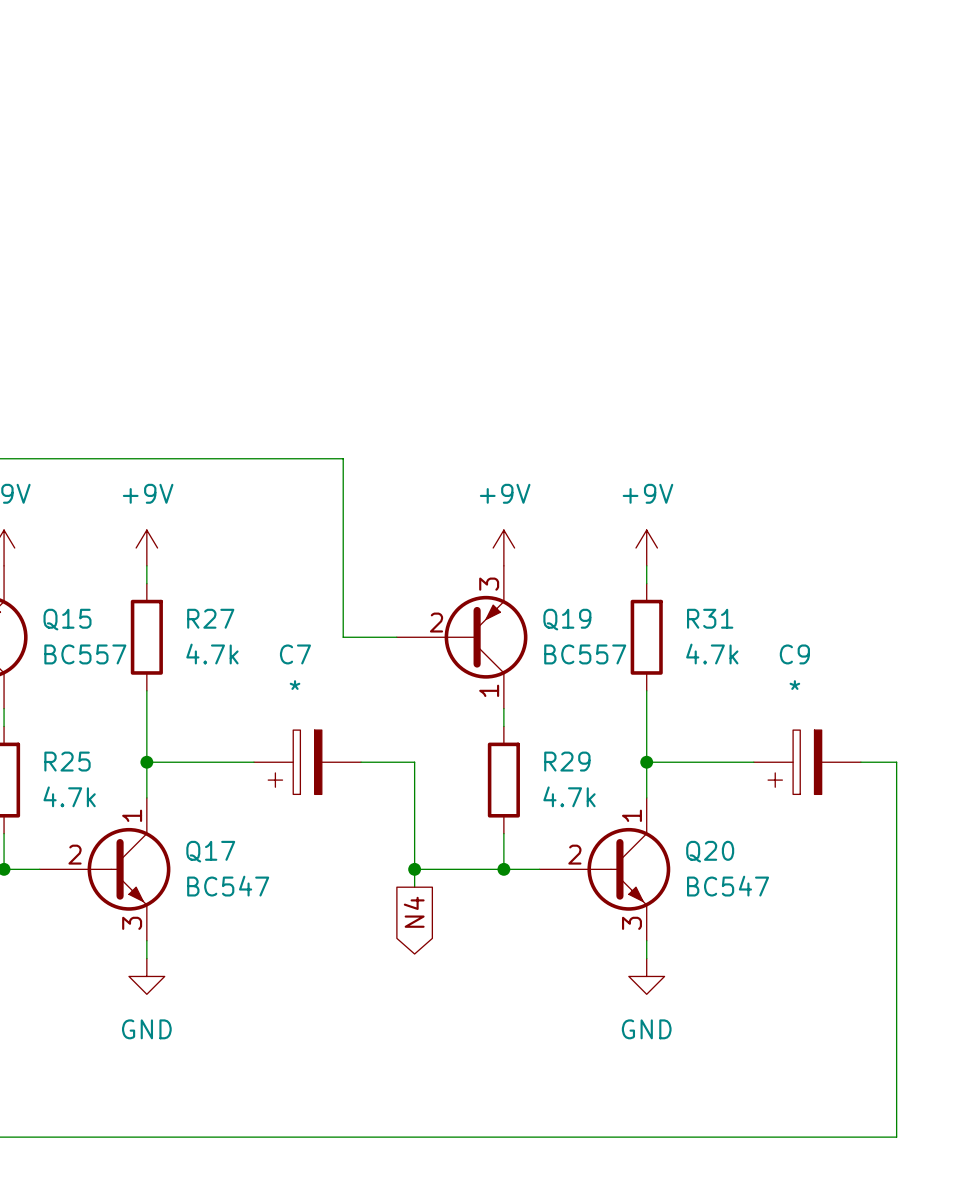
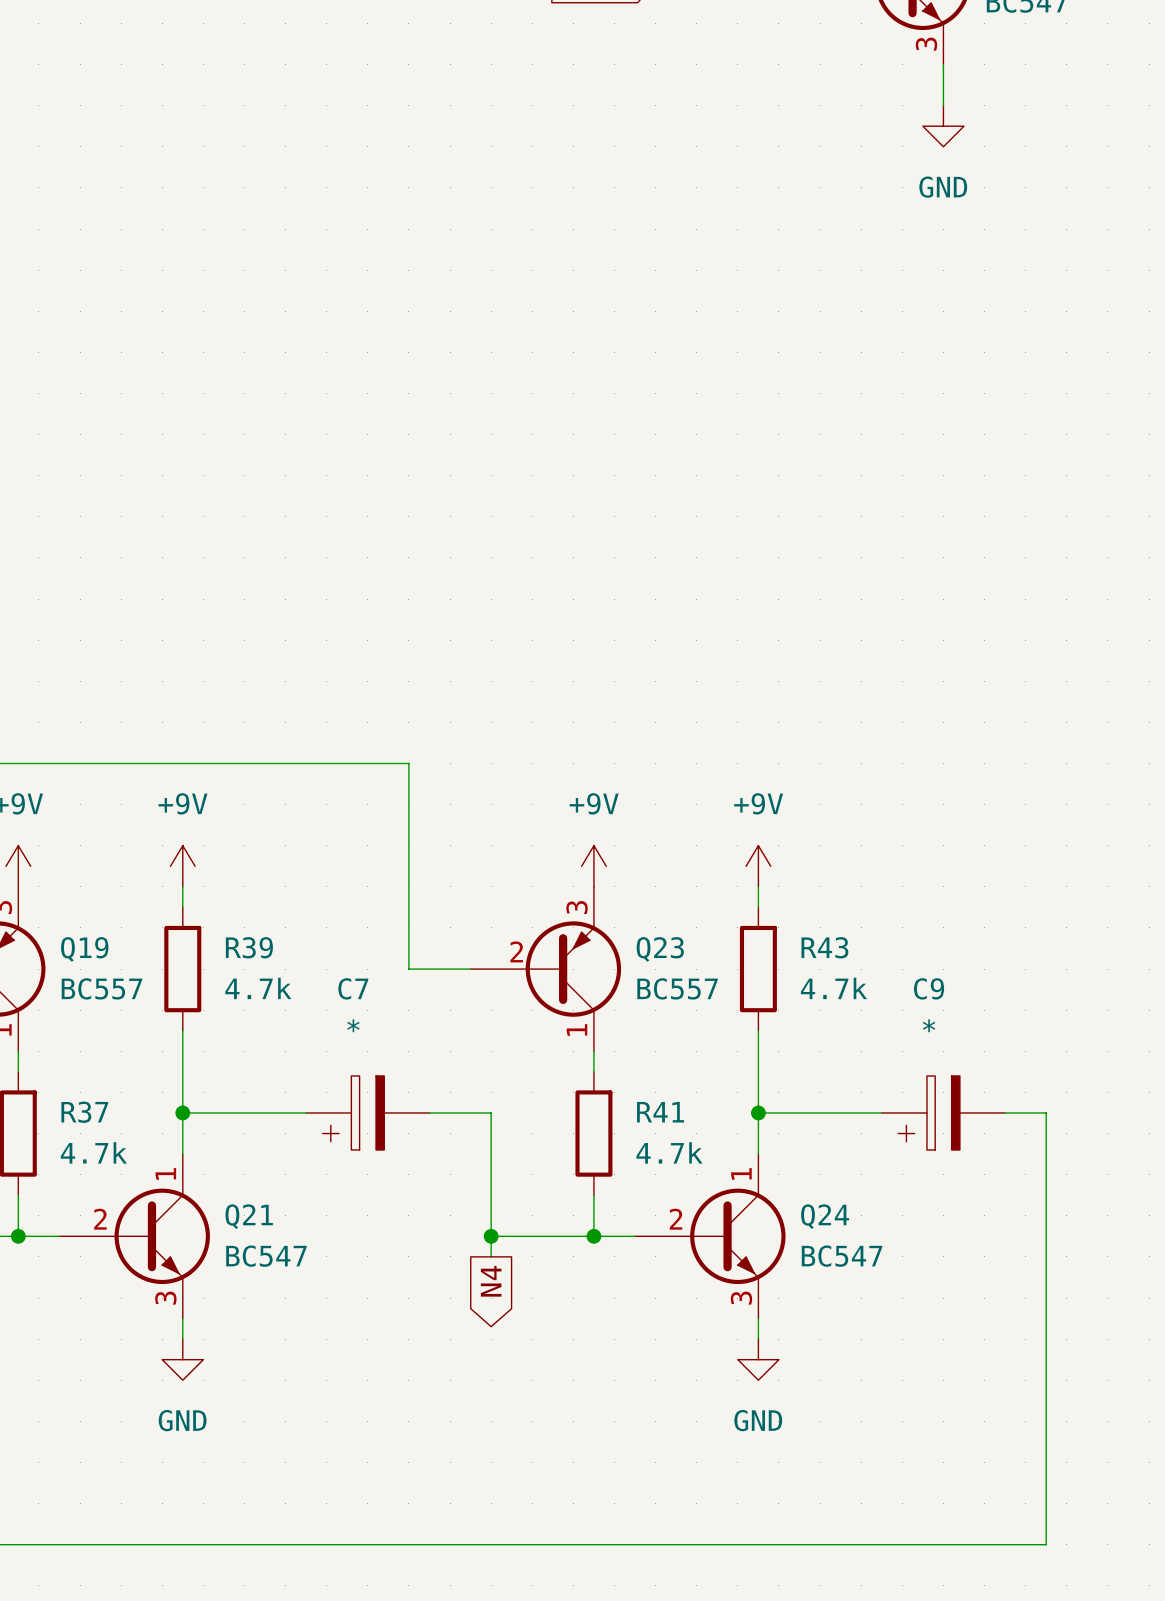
R27 name: R27 (210, 618) -> R39 (249, 947)
R31 name: R31 (710, 618) -> R43 (824, 947)
Q15 name: Q15 (67, 619) -> Q19 (84, 949)
Q19 name: Q19 (567, 619) -> Q23 (660, 949)
R25 name: R25 (67, 761) -> R37 (84, 1112)
R29 name: R29 (567, 761) -> R41 (660, 1112)
Q17 name: Q17 (210, 851) -> Q21 (249, 1216)
Q20 name: Q20 (710, 851) -> Q24 (825, 1216)

